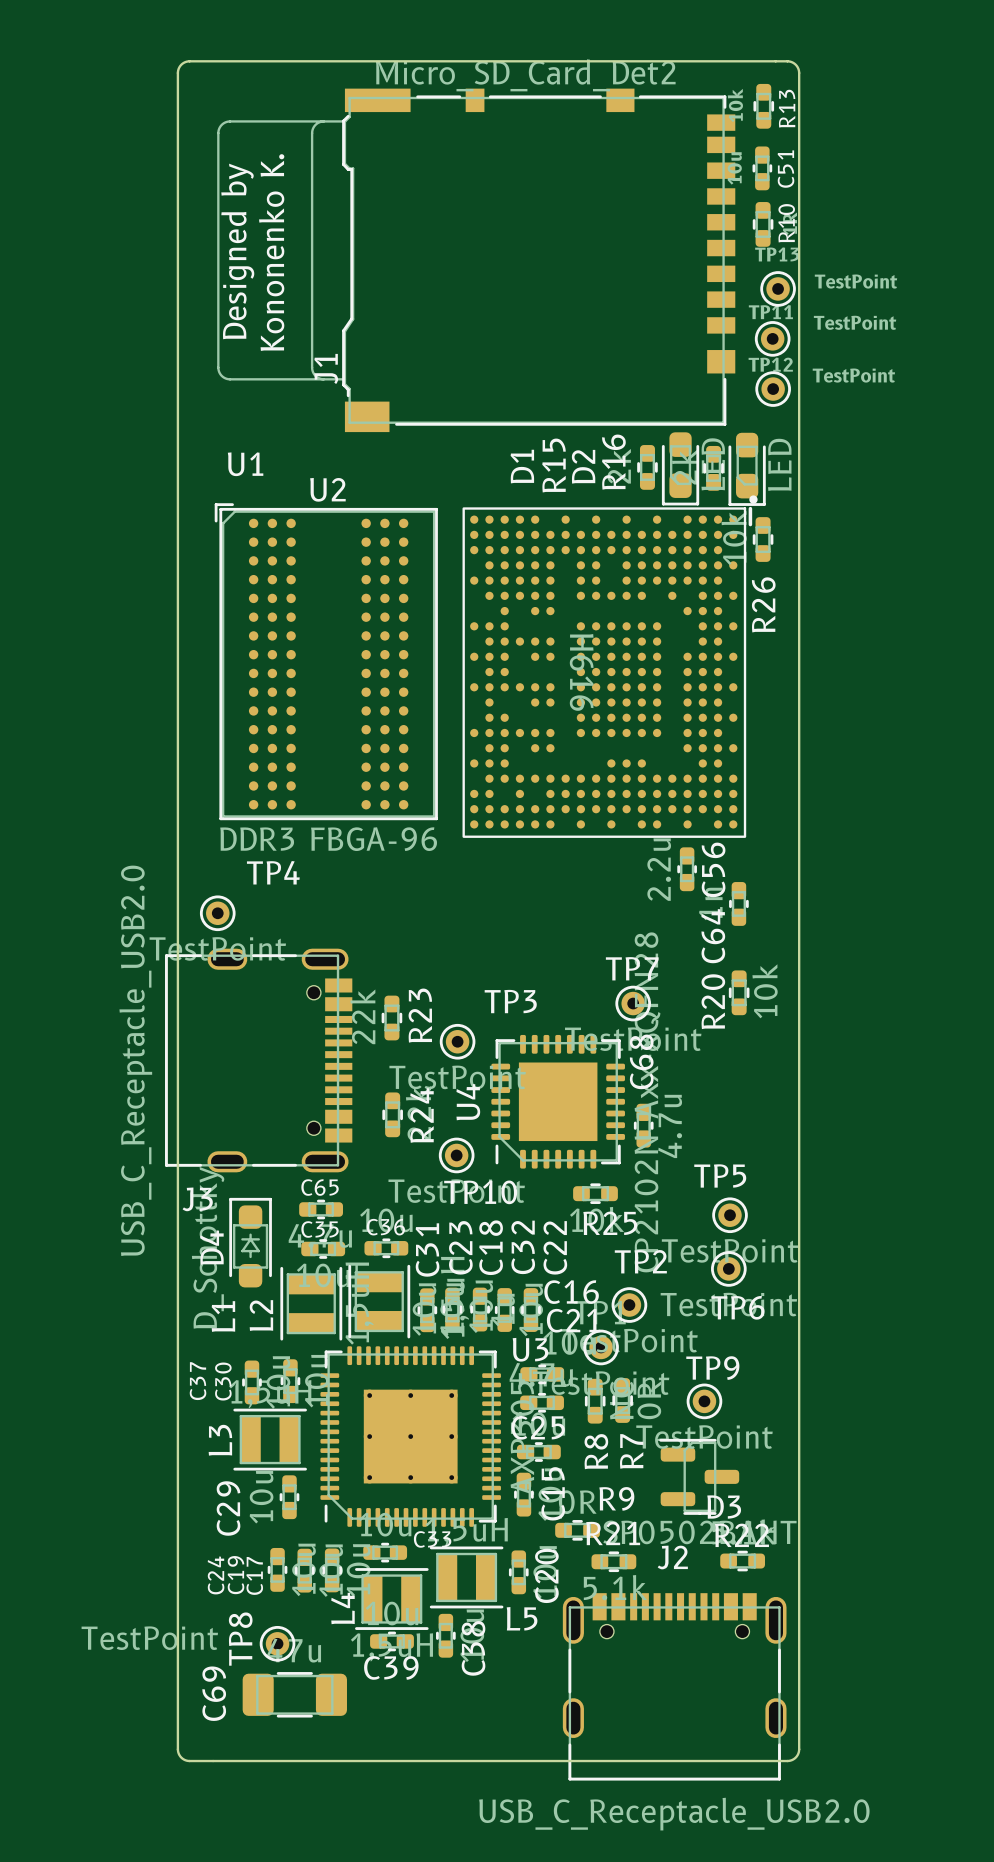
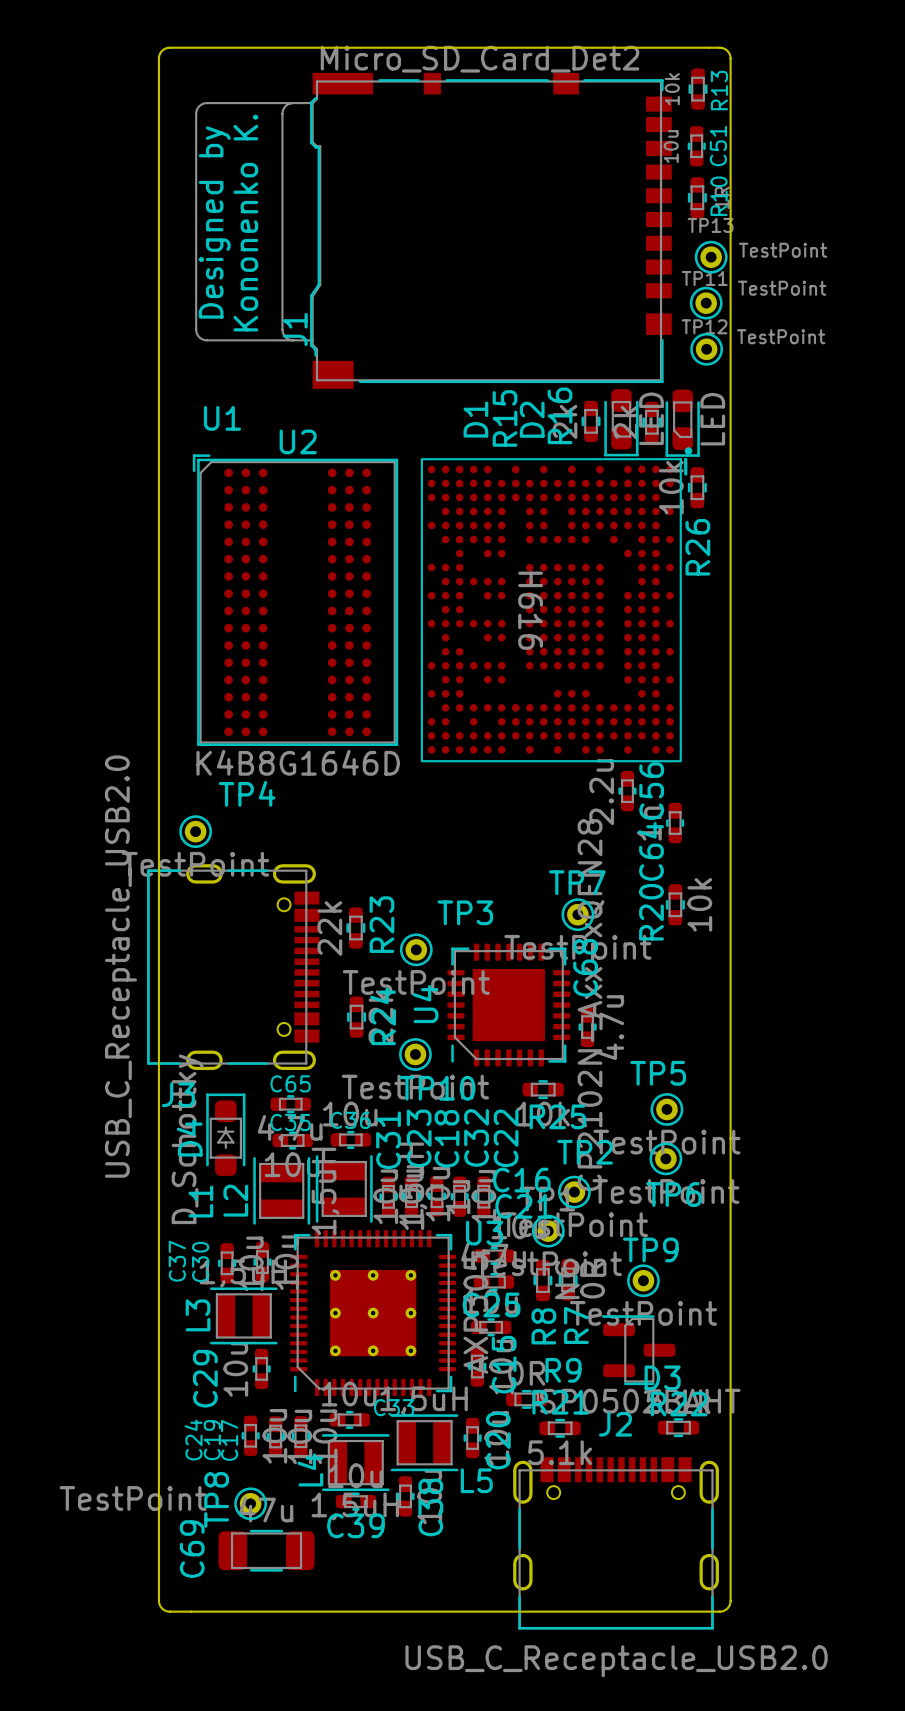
U2 value: DDR3 FBGA-96 (328, 839) -> K4B8G1646D (298, 762)

